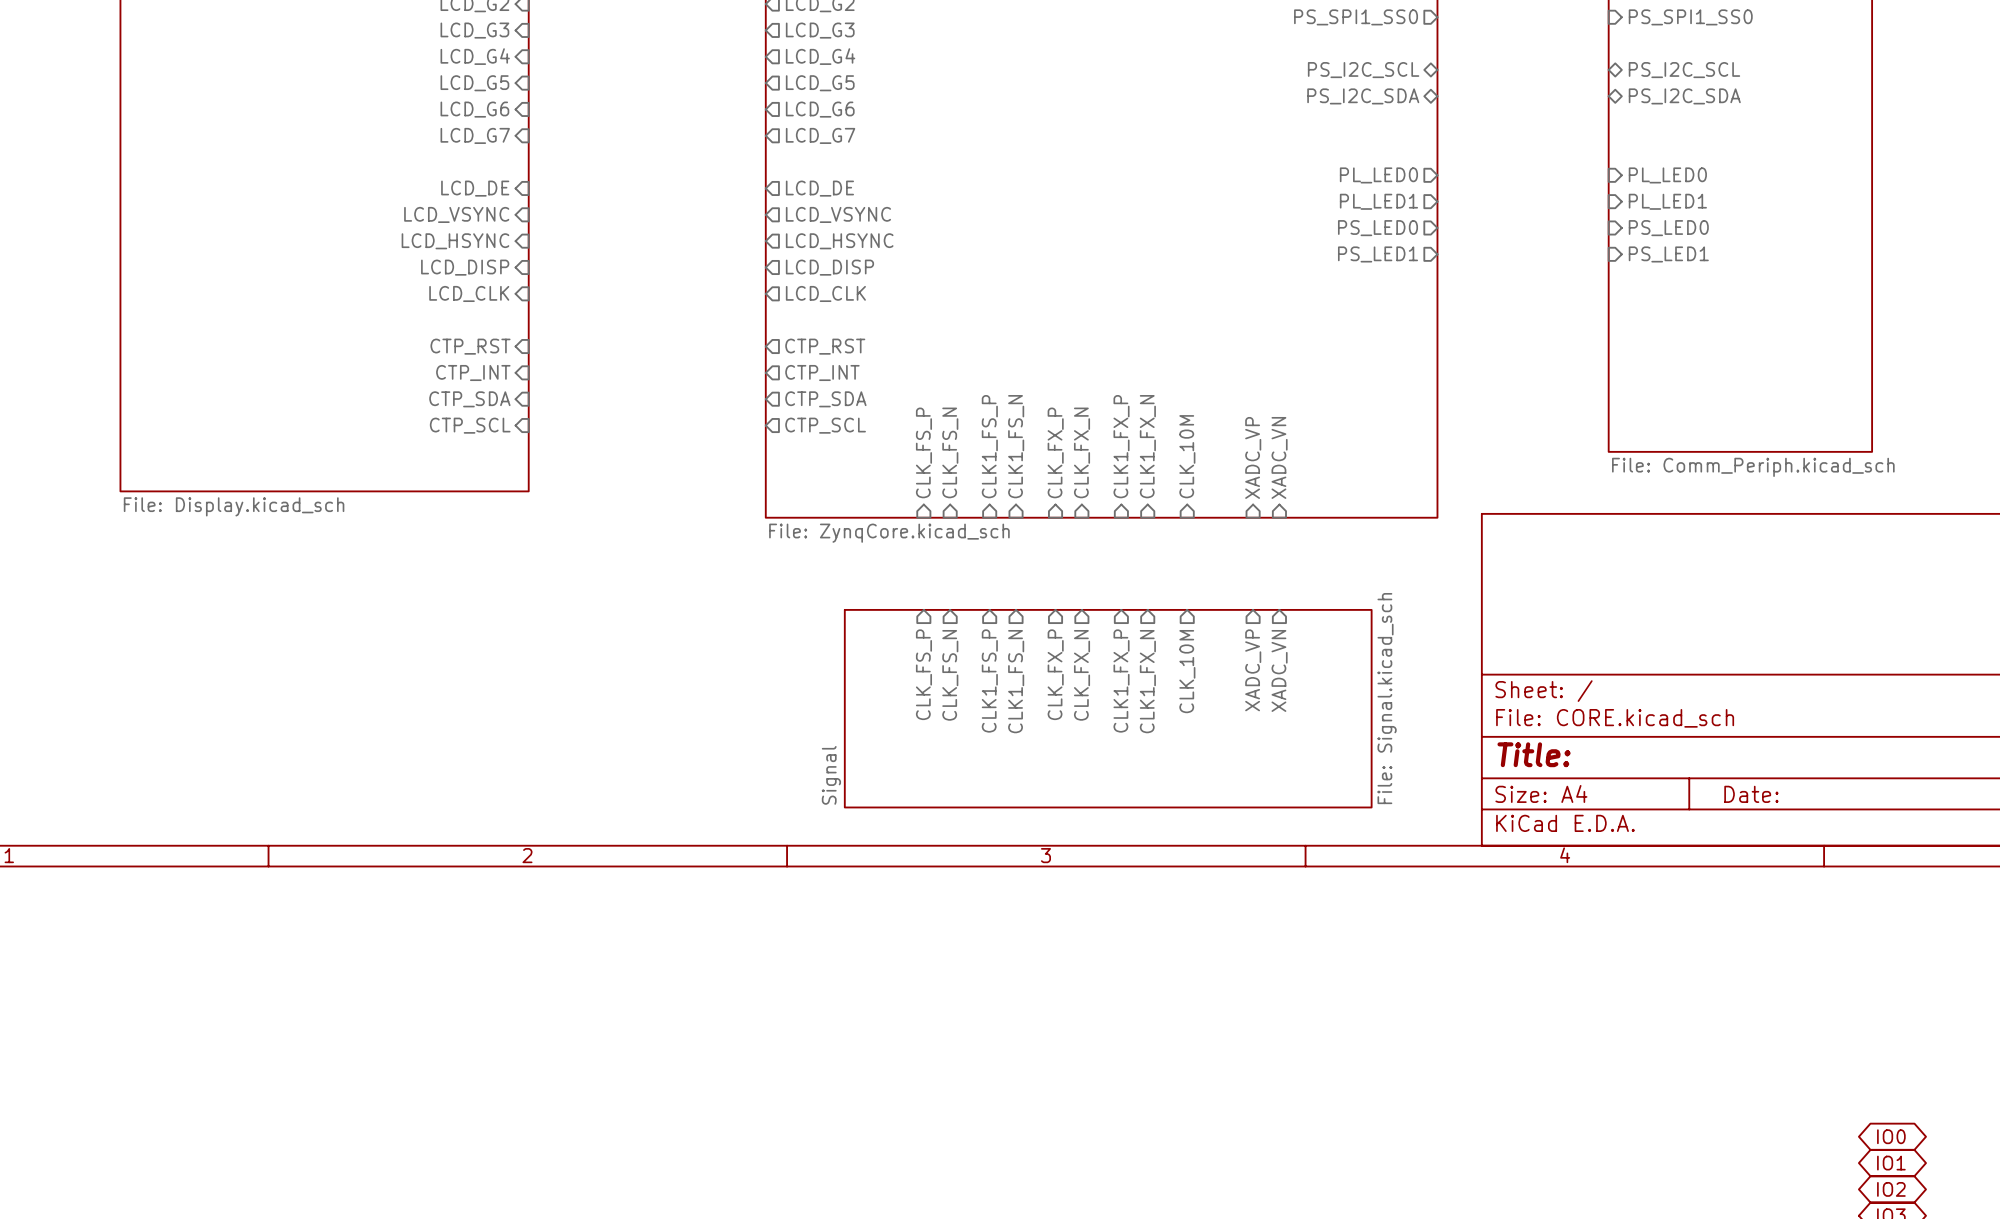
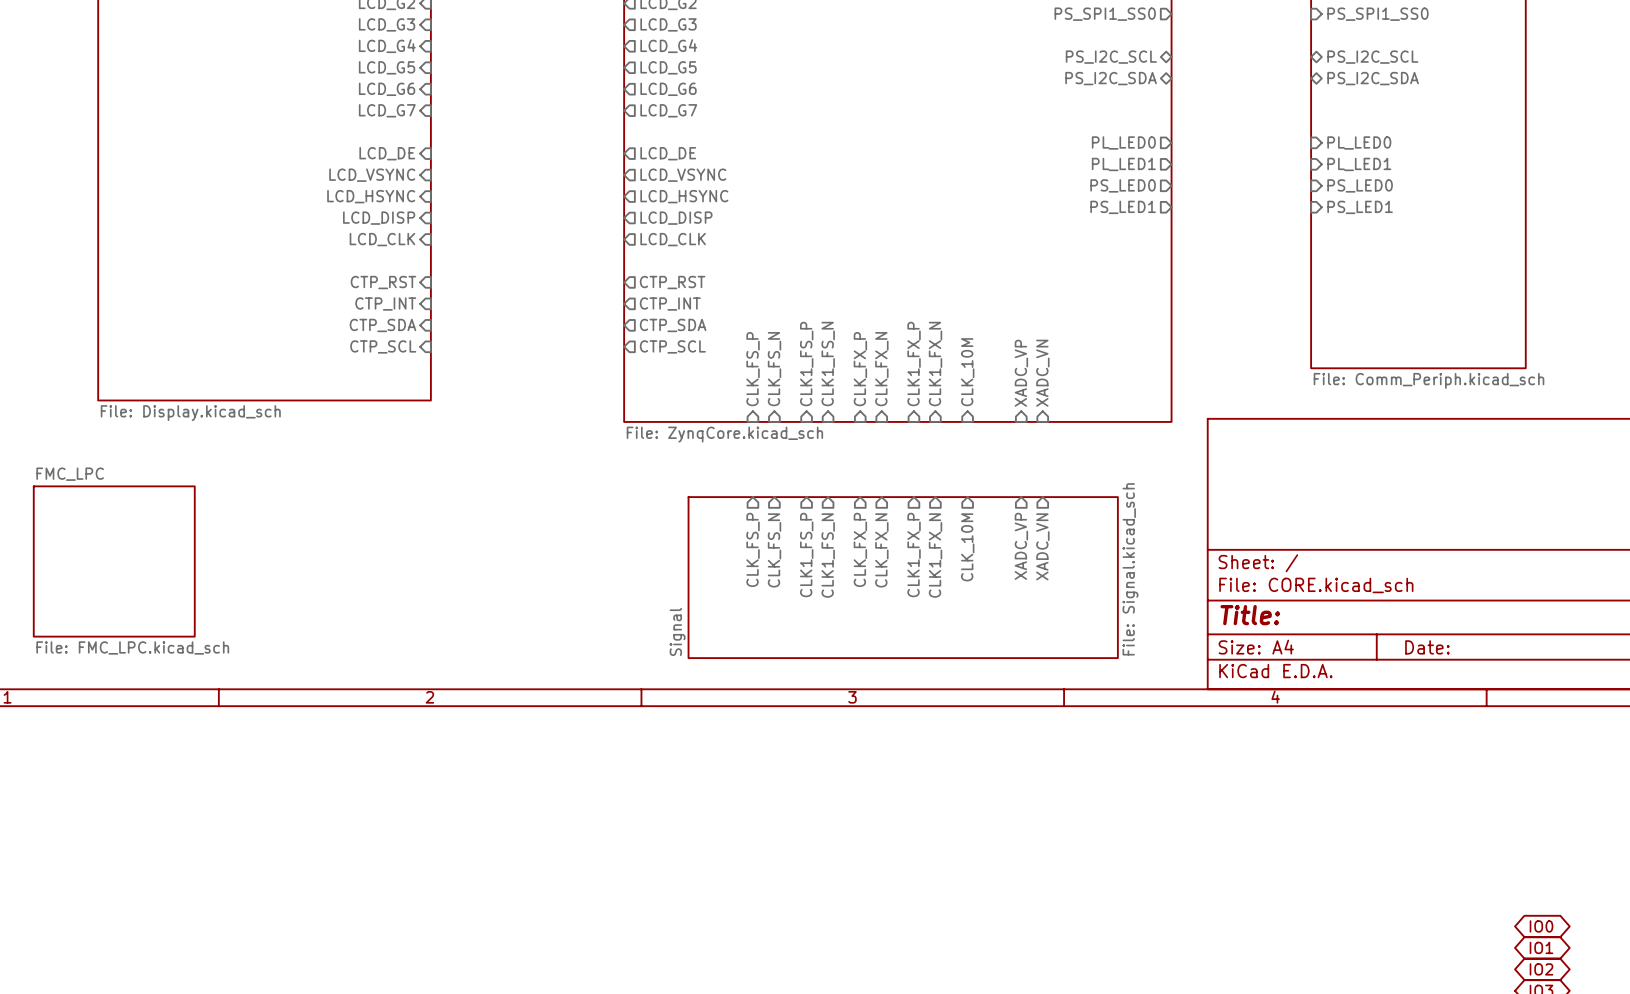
sheet FMC_LPC: none -> File: FMC_LPC.kicad_sch (114, 561)

